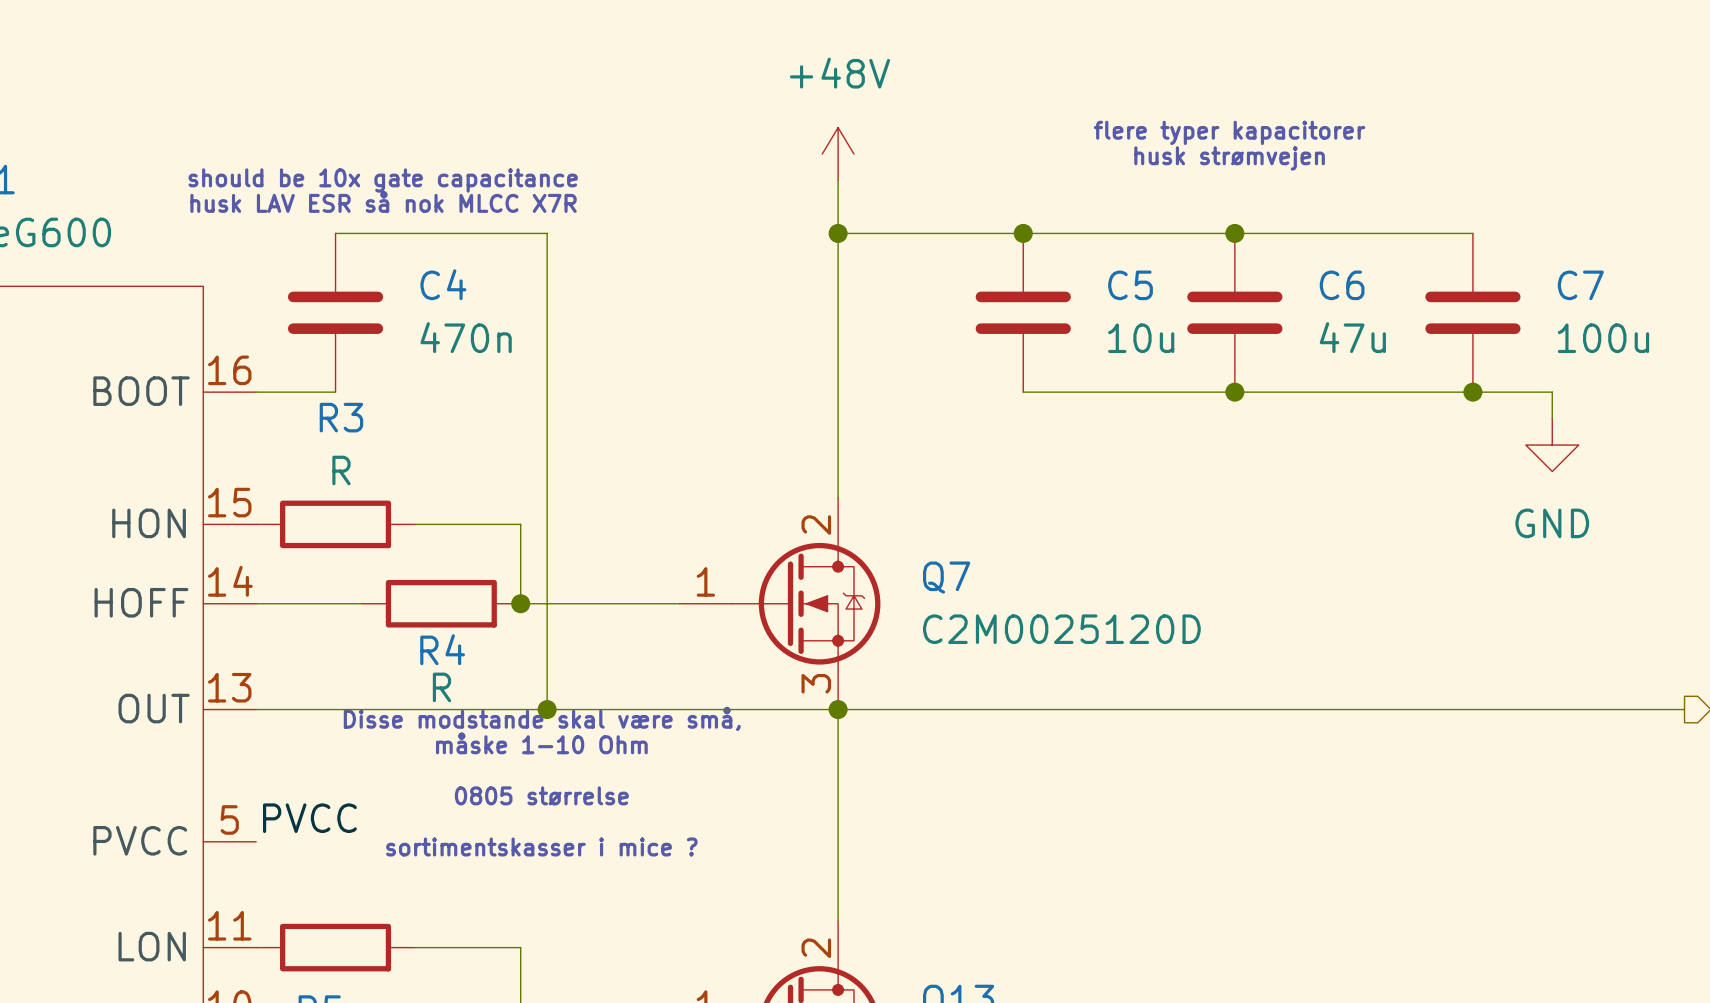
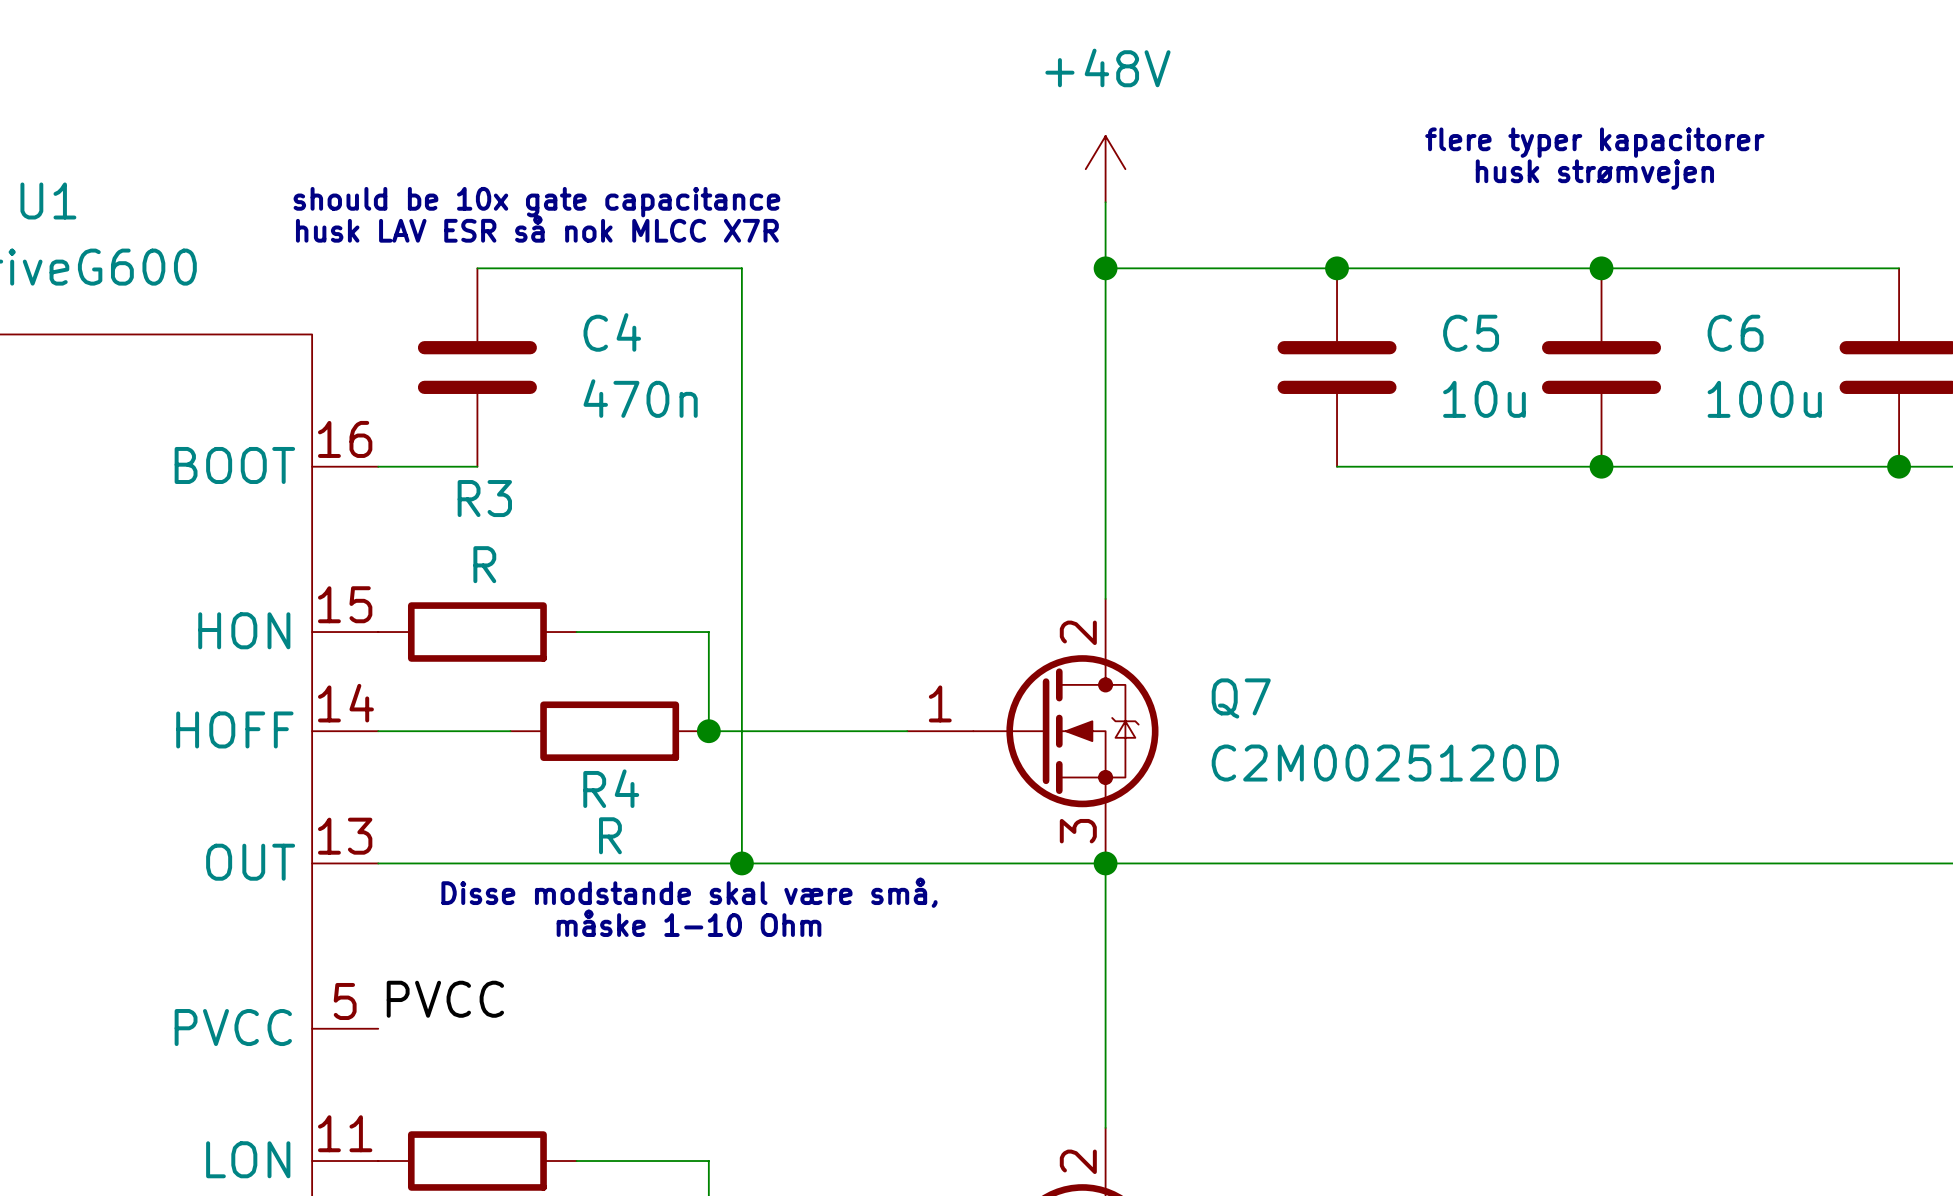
C6 value: 47u (1352, 337) -> 100u (1764, 399)
text position: Disse modstande skal være små, (542, 718) -> Disse modstande skal være små, (689, 892)
text position: måske 1-10 Ohm (541, 743) -> måske 1-10 Ohm (689, 923)
text: 0805 størrelse (541, 795) -> none
text: sortimentskasser i mice ? (541, 846) -> none

